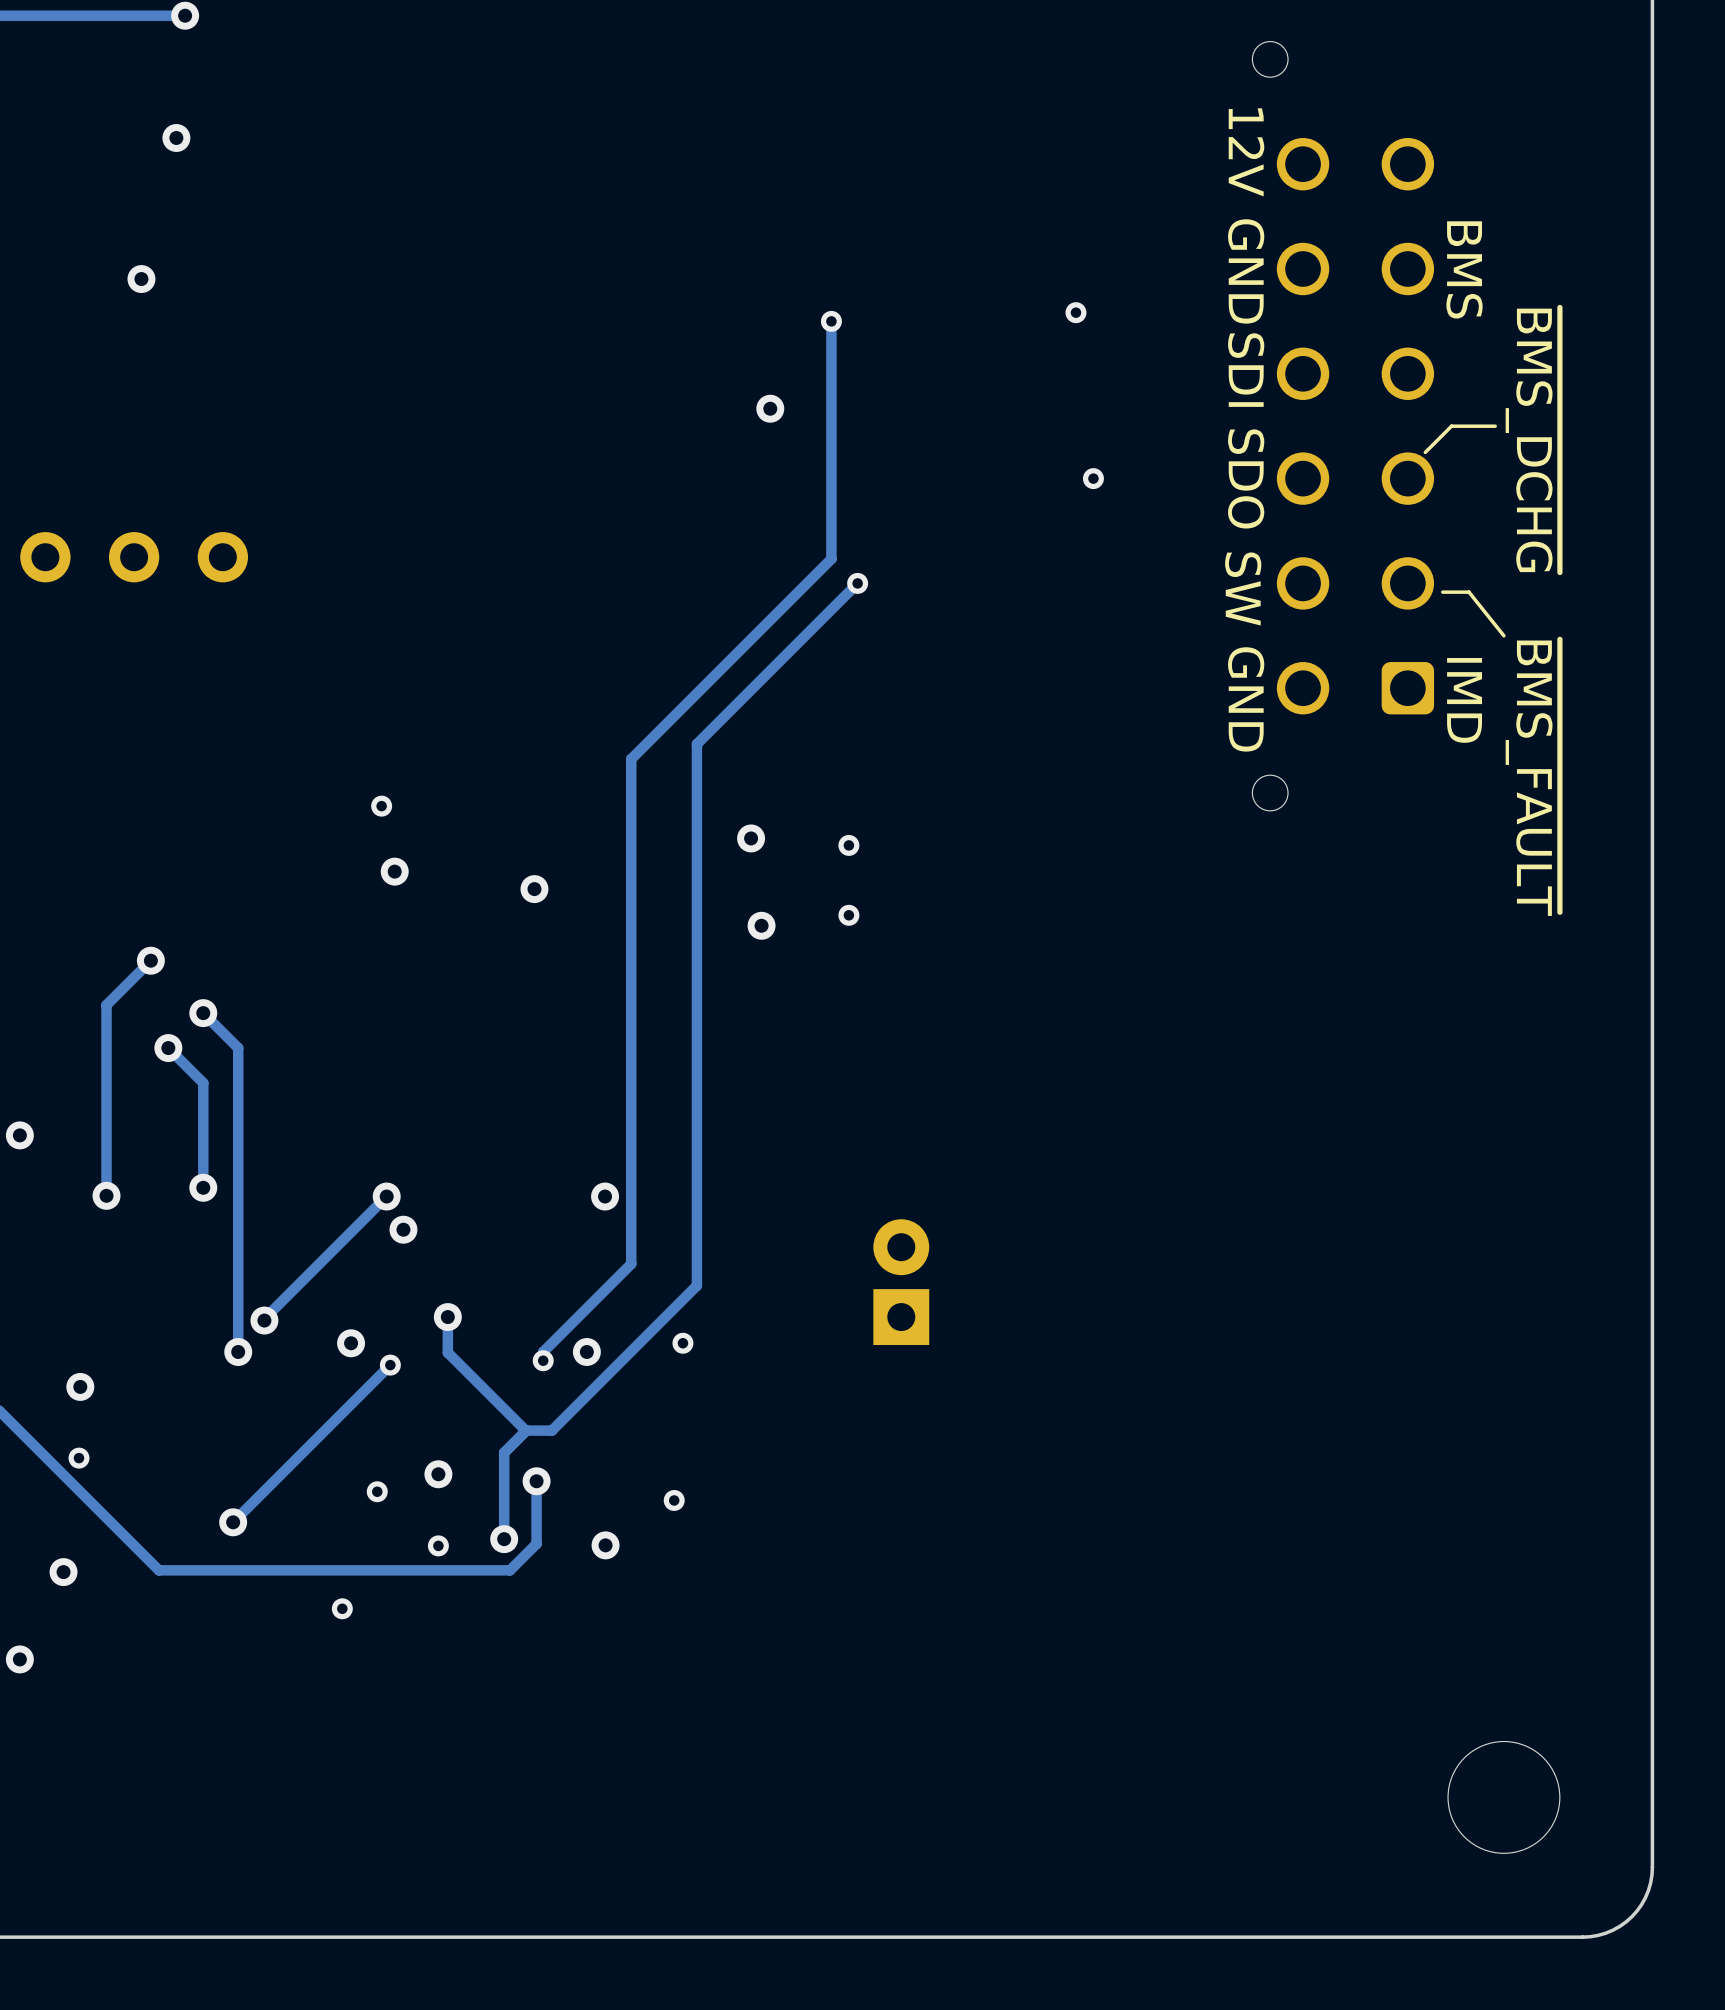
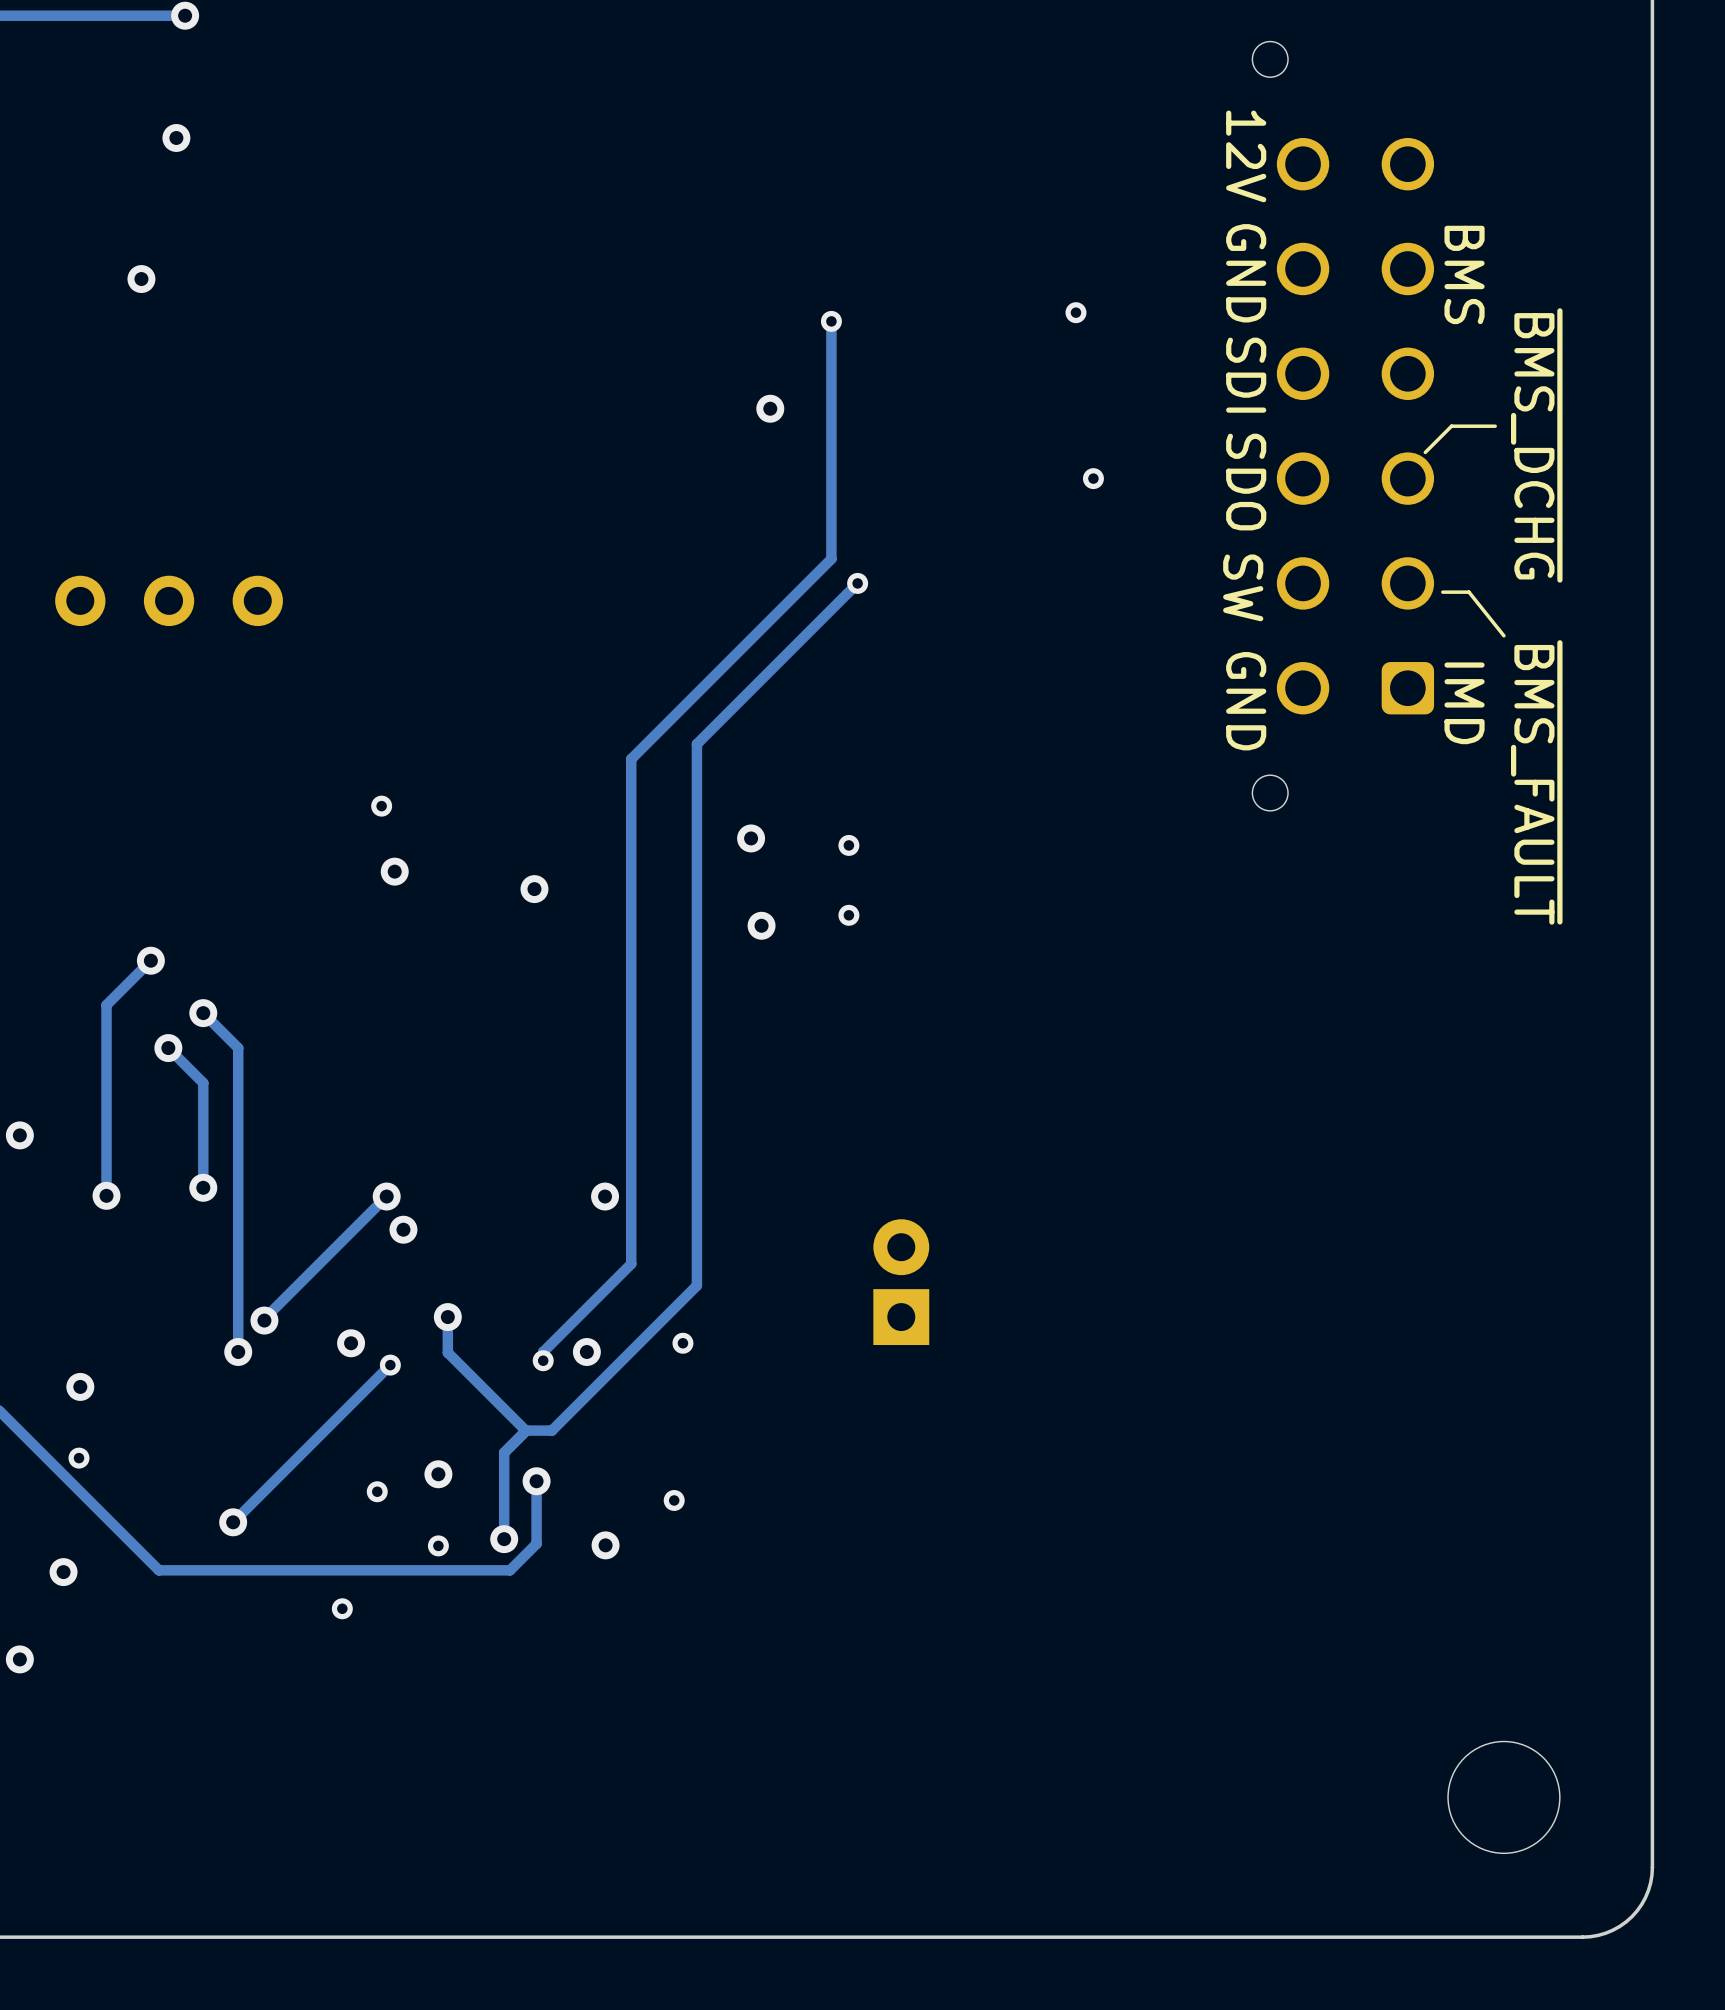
part position: (134, 557) -> (169, 600)

